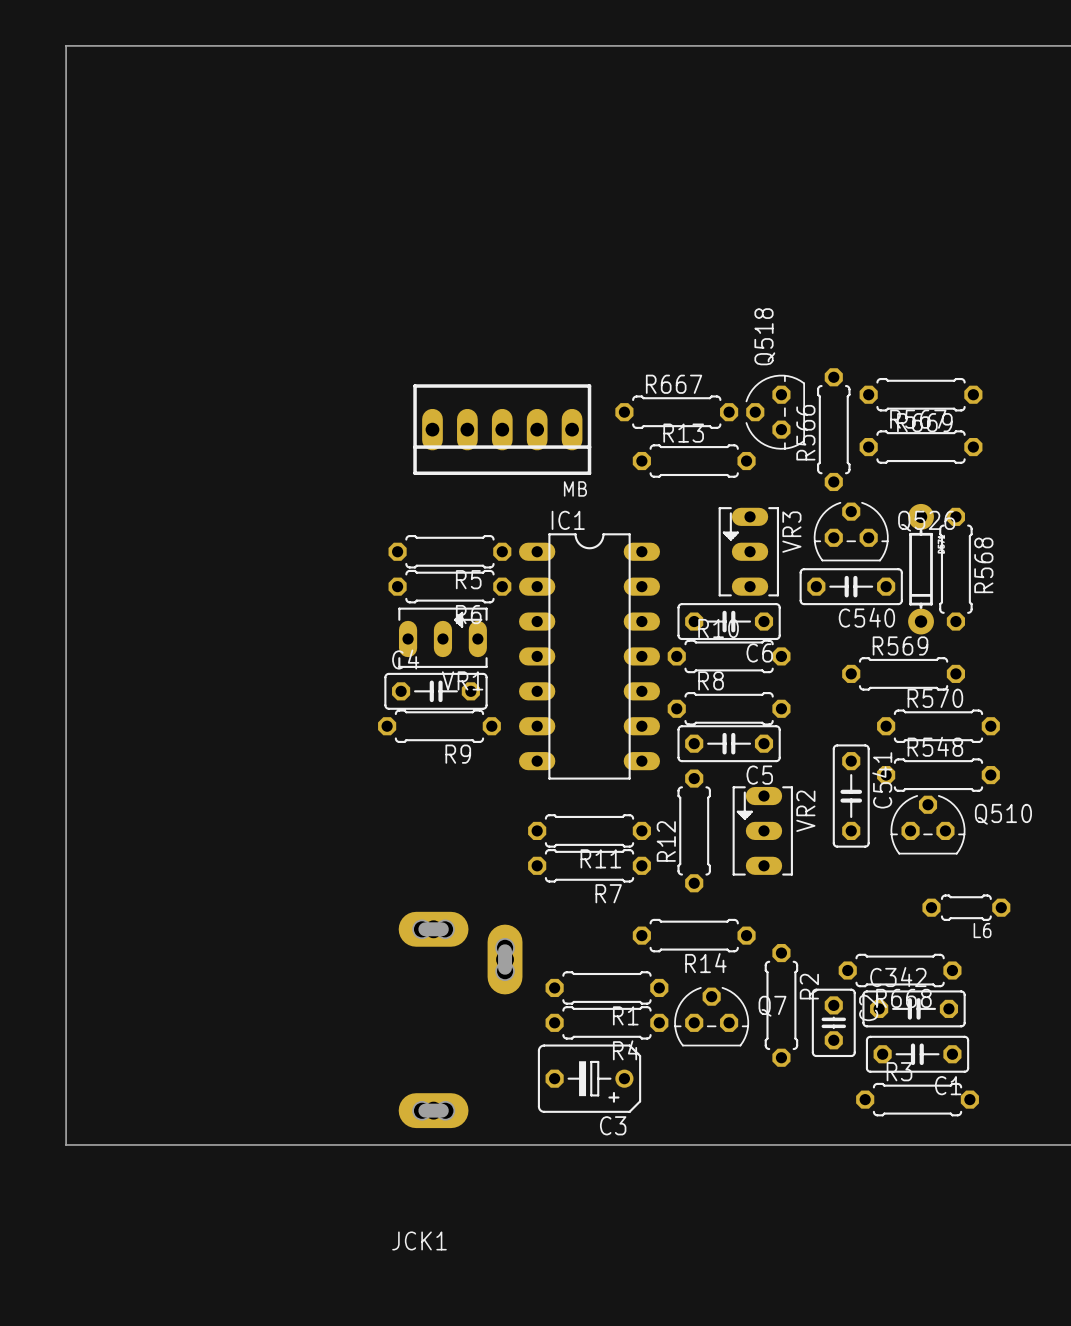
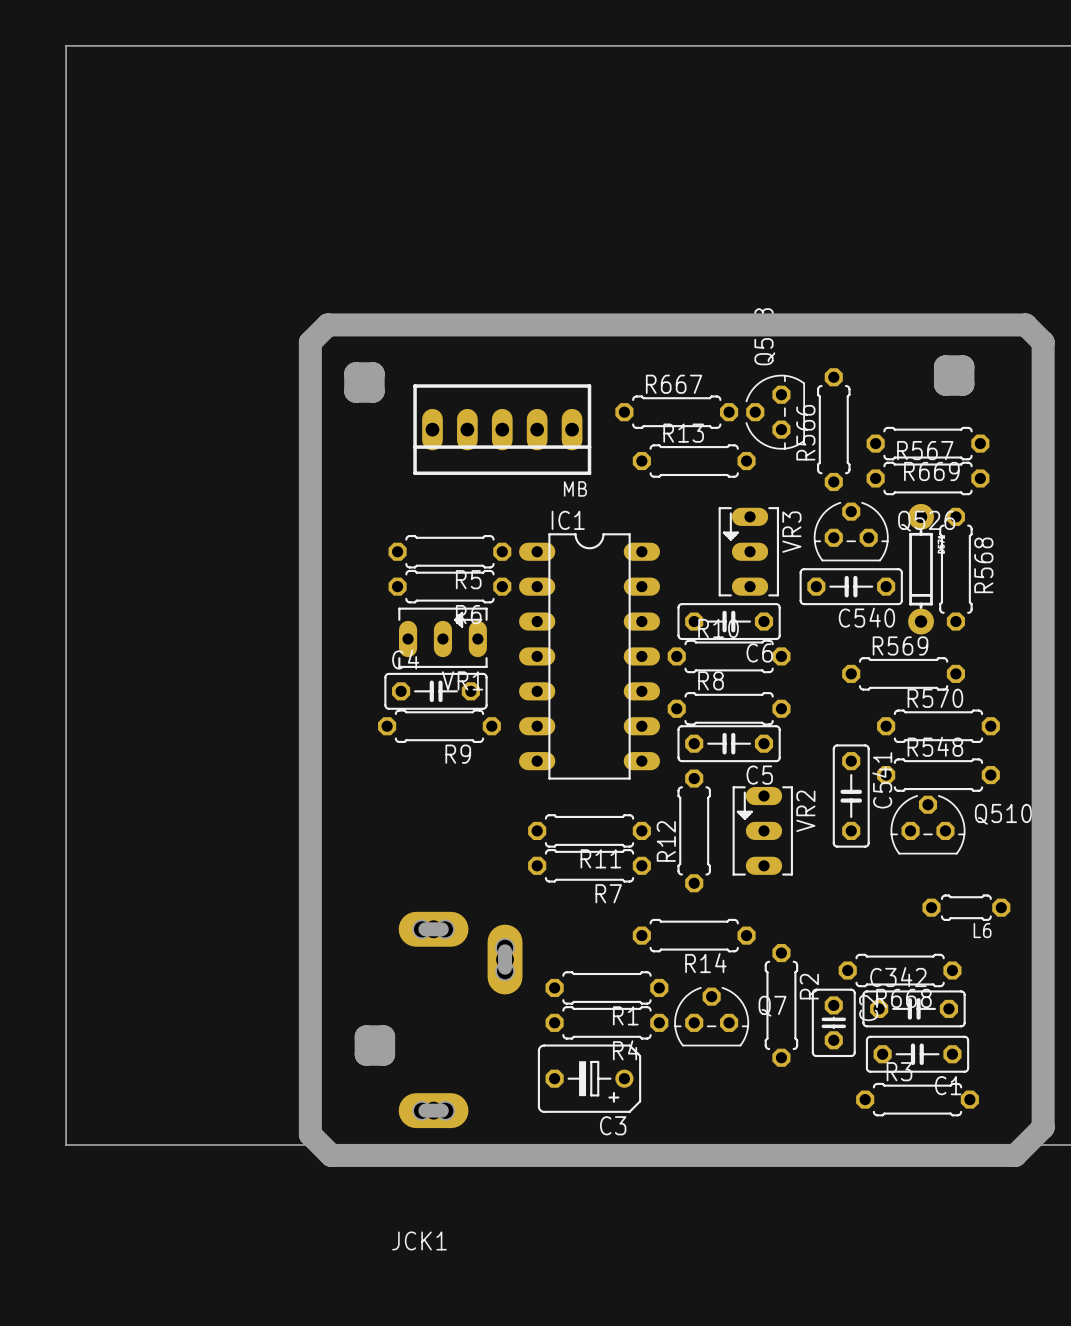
board edge: none -> (327, 324) (1025, 324) (1043, 342) (1043, 1127) (1015, 1155) (331, 1155) (310, 1134) (310, 342) (327, 324)
board edge: none -> (945, 366) (962, 366) (962, 384) (945, 384) (945, 366)
board edge: none -> (355, 373) (373, 373) (373, 391) (355, 391) (355, 373)
R669 position: (921, 394) -> (928, 443)
R567 position: (921, 447) -> (928, 478)
board edge: none -> (366, 1036) (383, 1036) (383, 1054) (366, 1054) (366, 1036)

